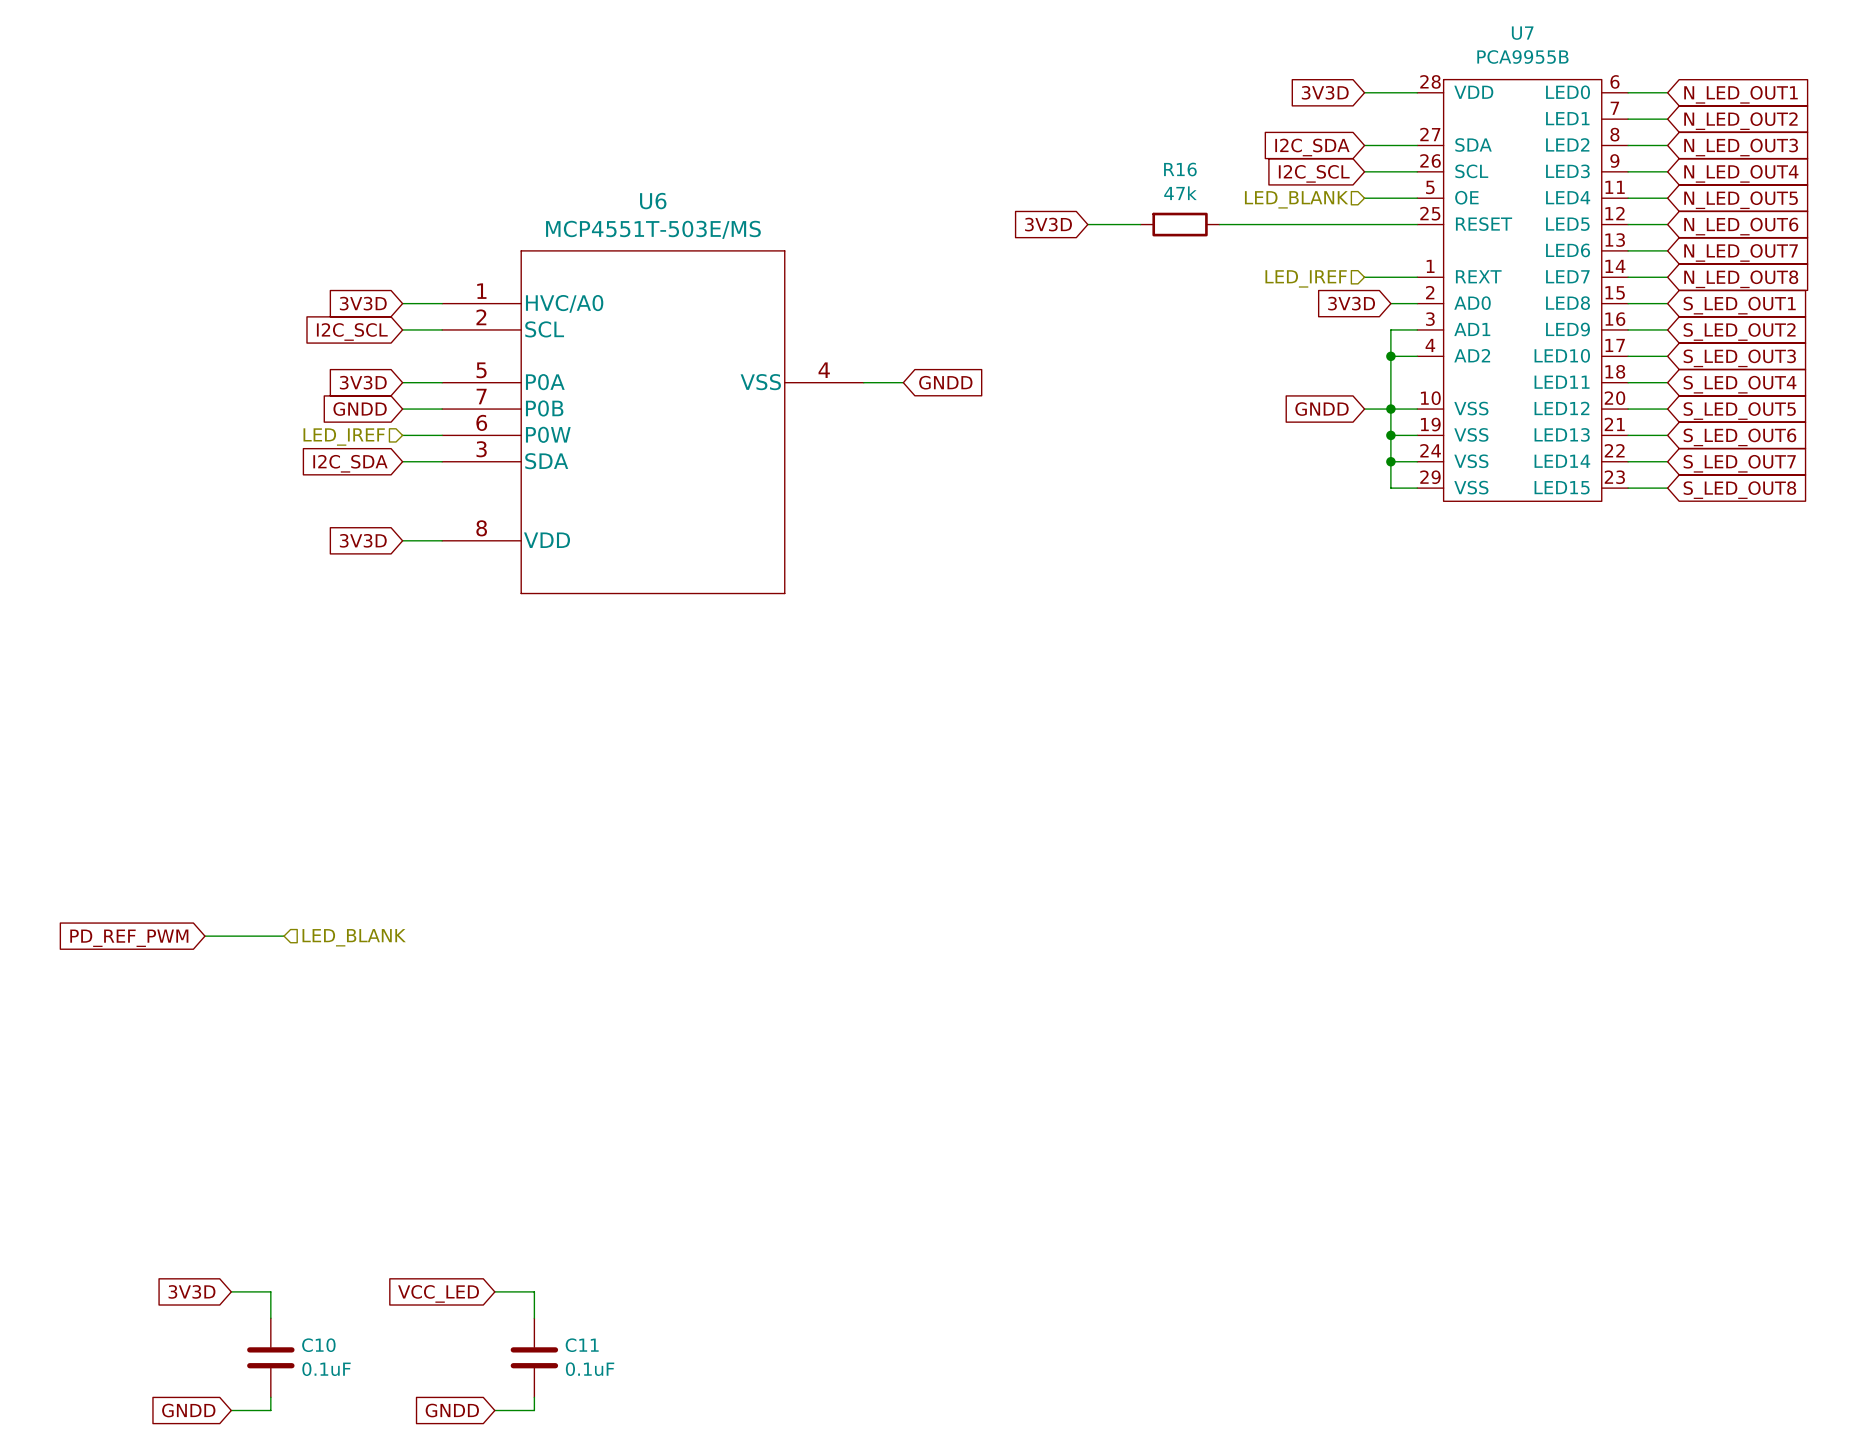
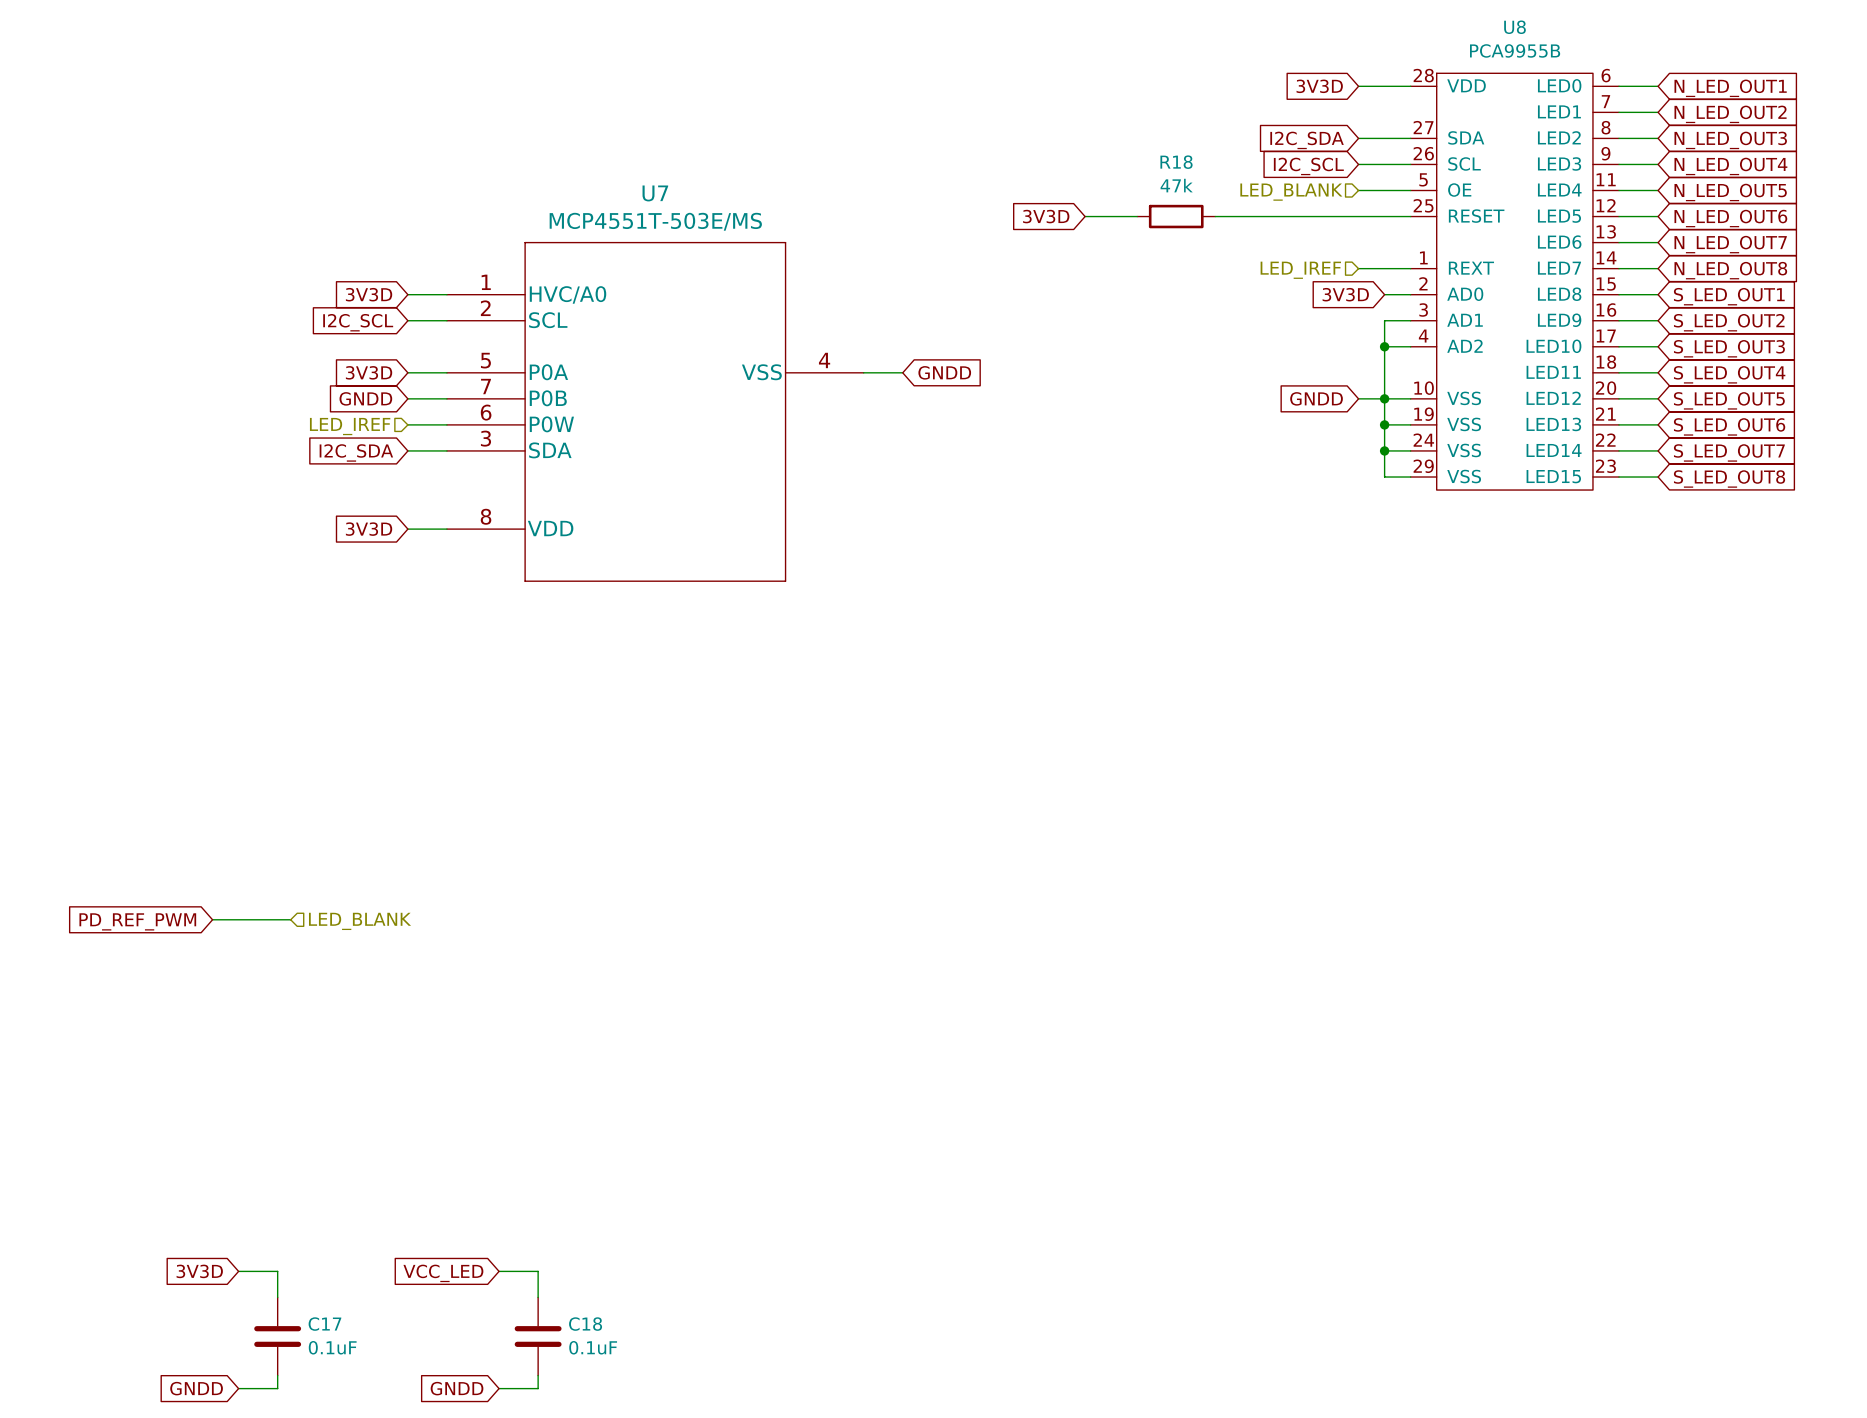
U7 name: U7 (1522, 33) -> U8 (1515, 27)
R16 name: R16 (1180, 169) -> R18 (1176, 162)
U6 name: U6 (653, 201) -> U7 (655, 193)
C10 name: C10 (318, 1345) -> C17 (324, 1324)
C11 name: C11 (582, 1345) -> C18 (585, 1324)

